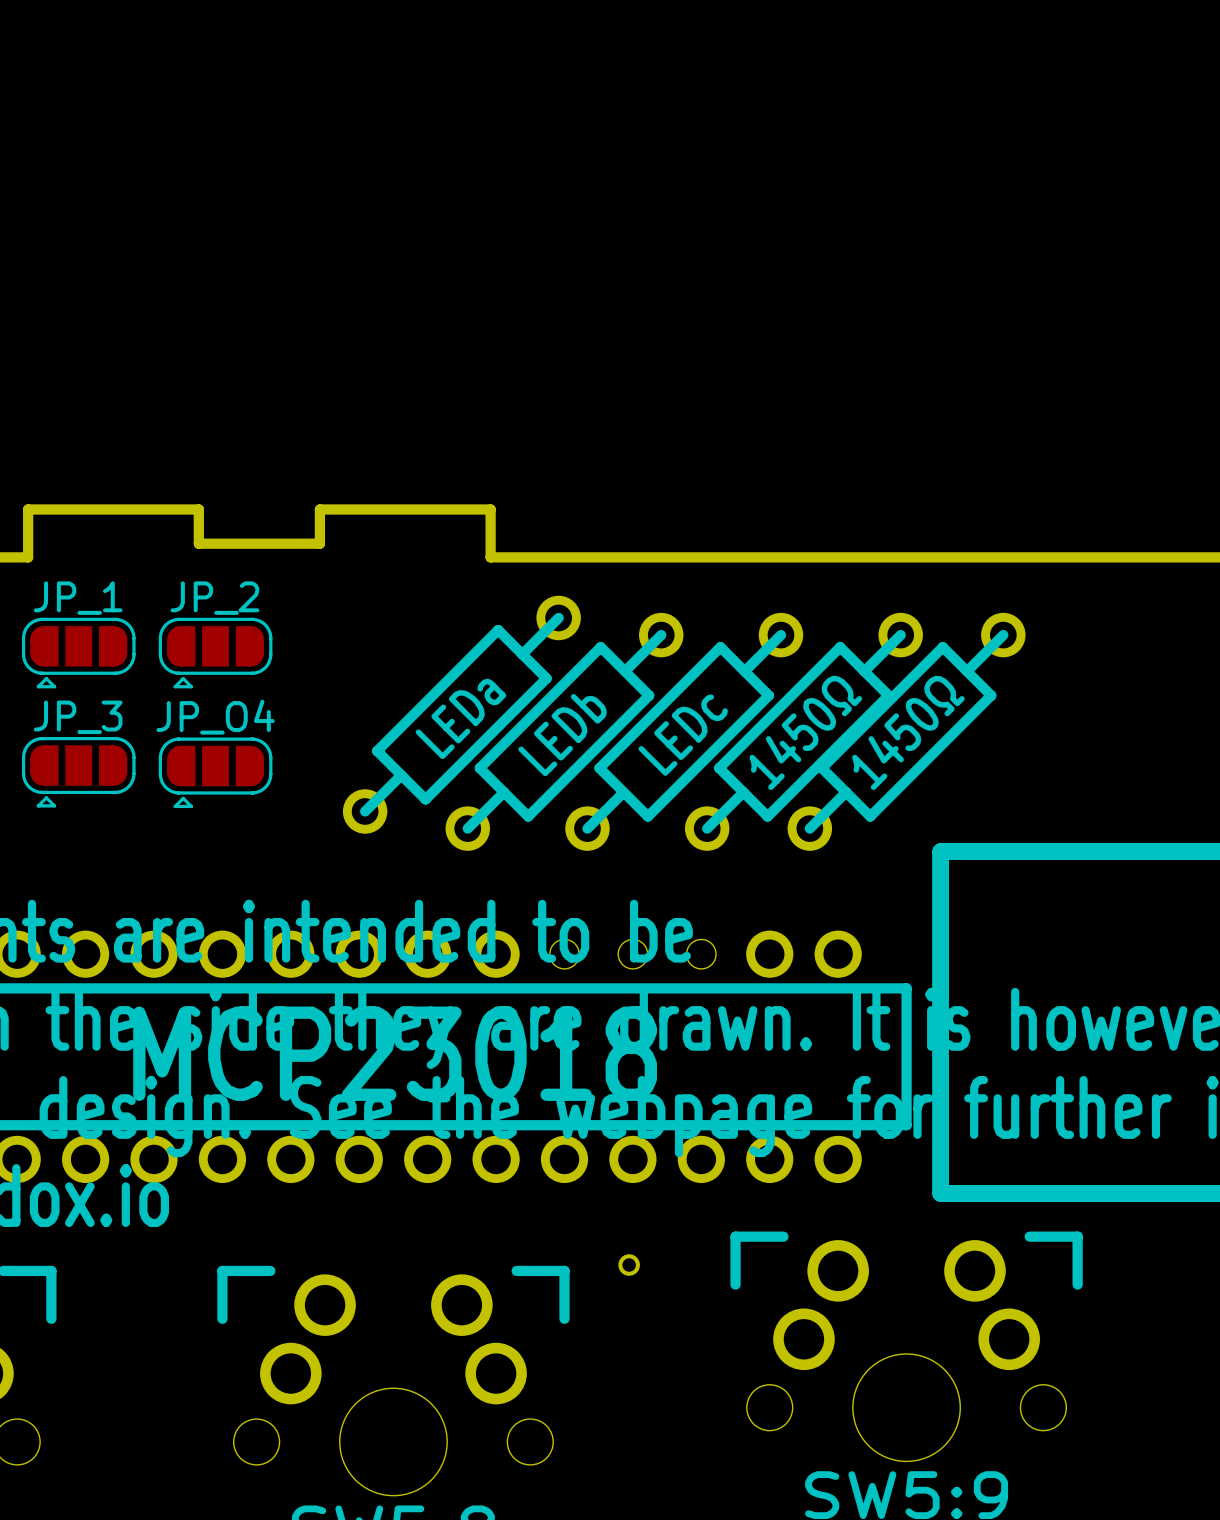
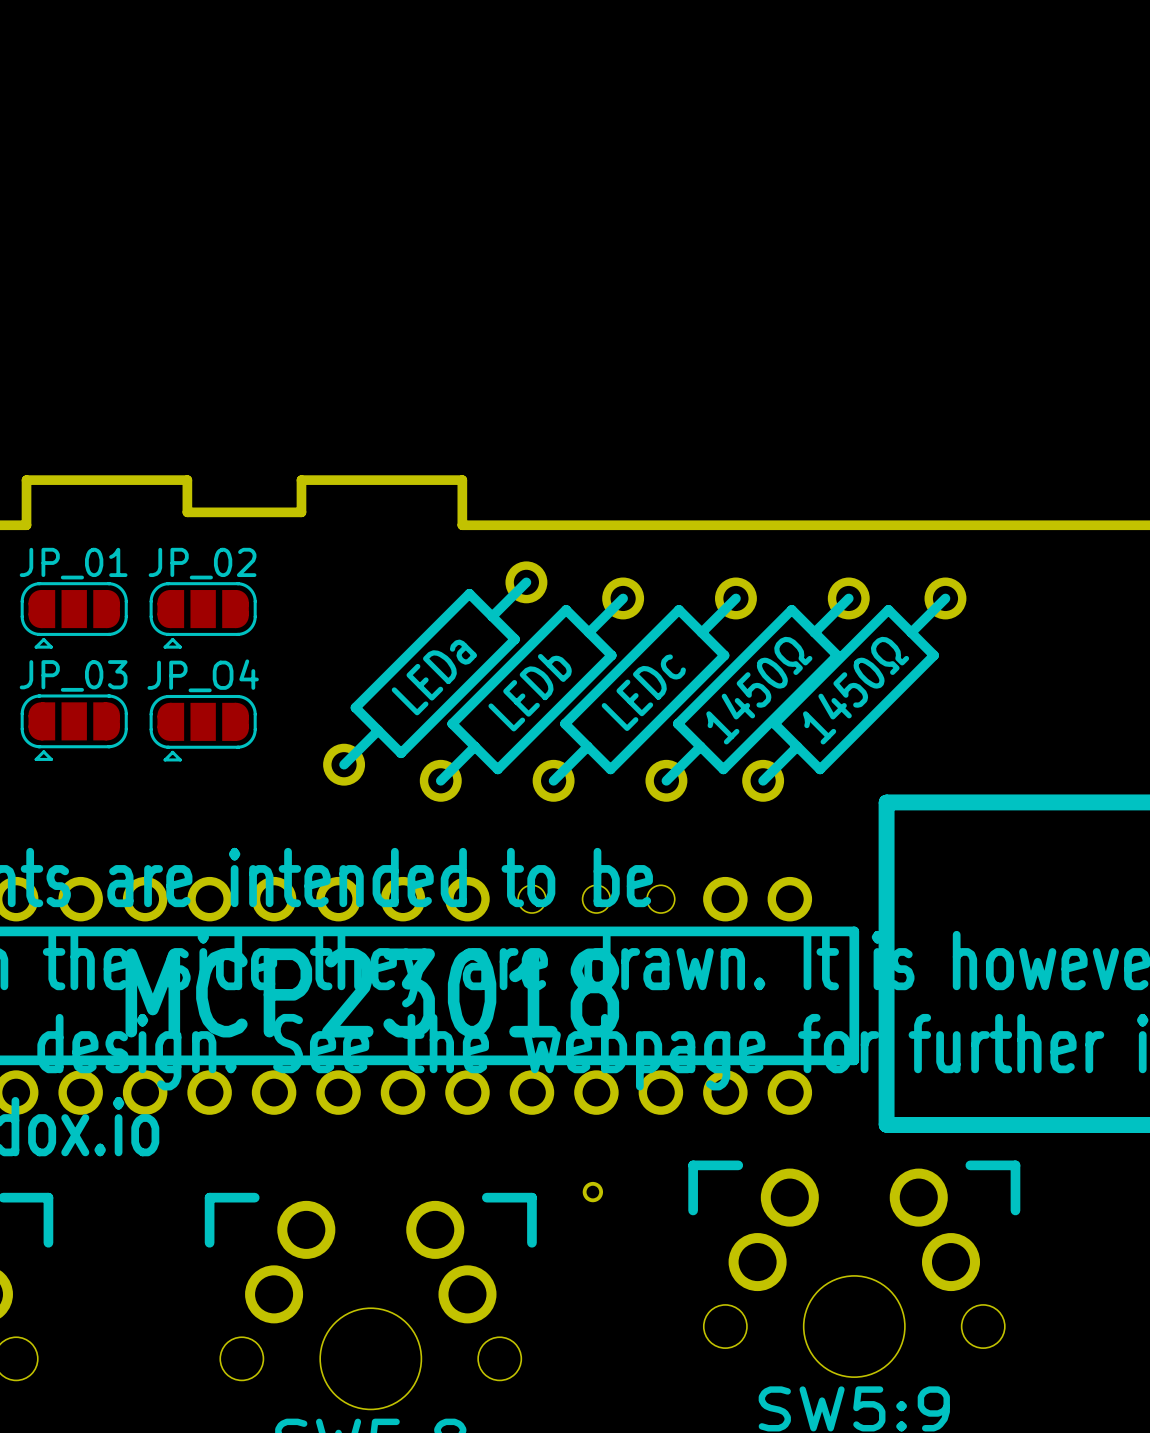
JP_1 name: JP_1 (78, 598) -> JP_01 (73, 563)
JP_2 name: JP_2 (214, 598) -> JP_02 (202, 563)
JP_3 name: JP_3 (78, 717) -> JP_03 (73, 675)

